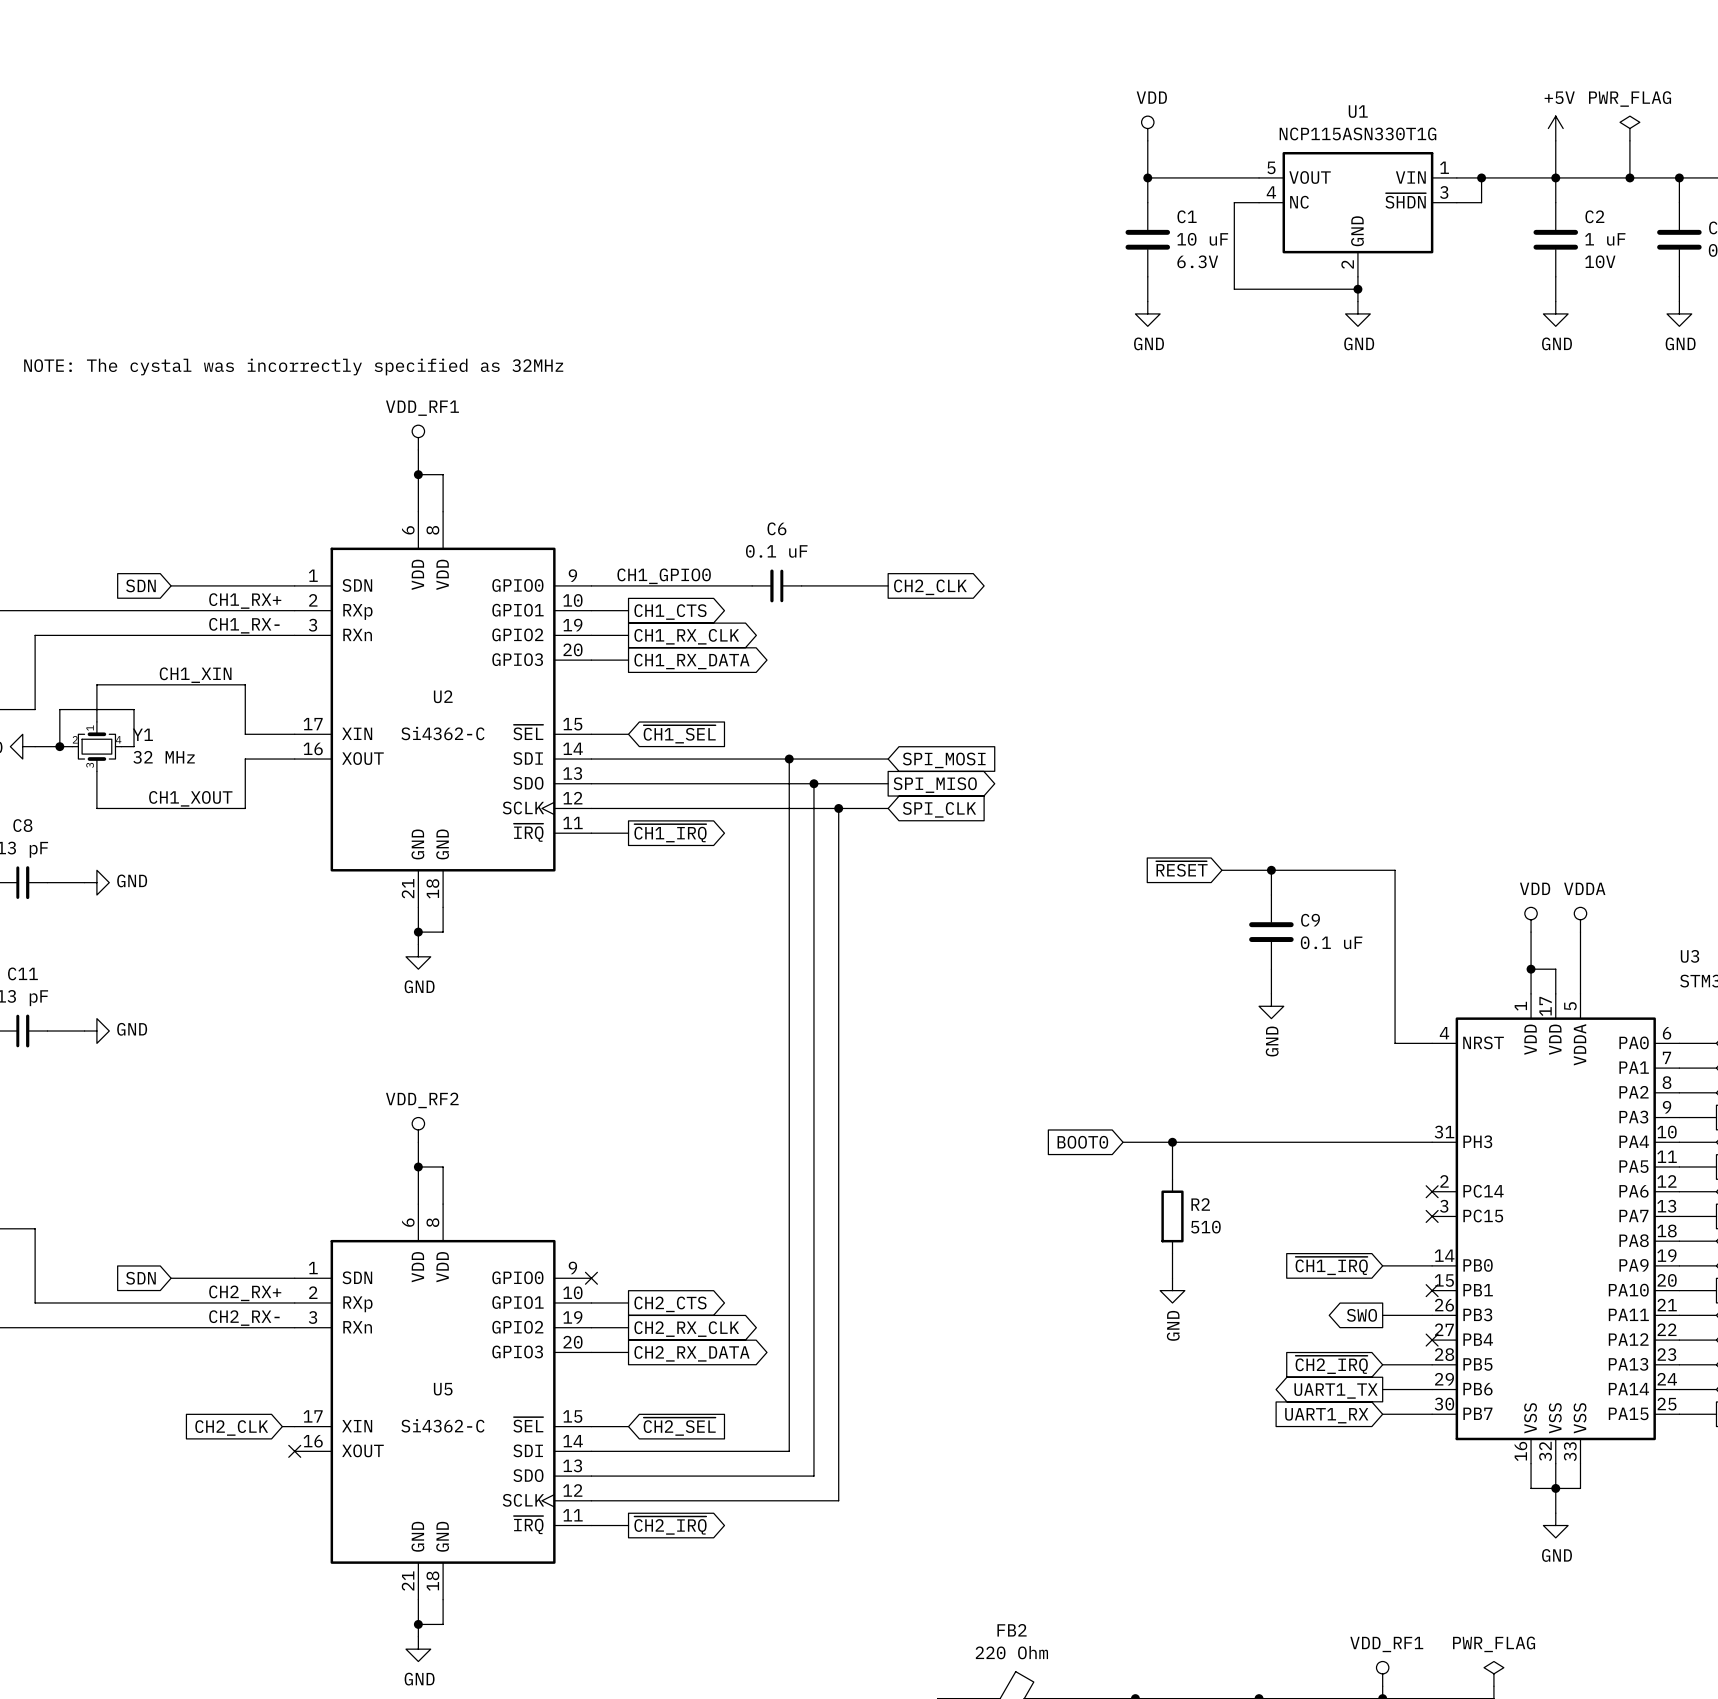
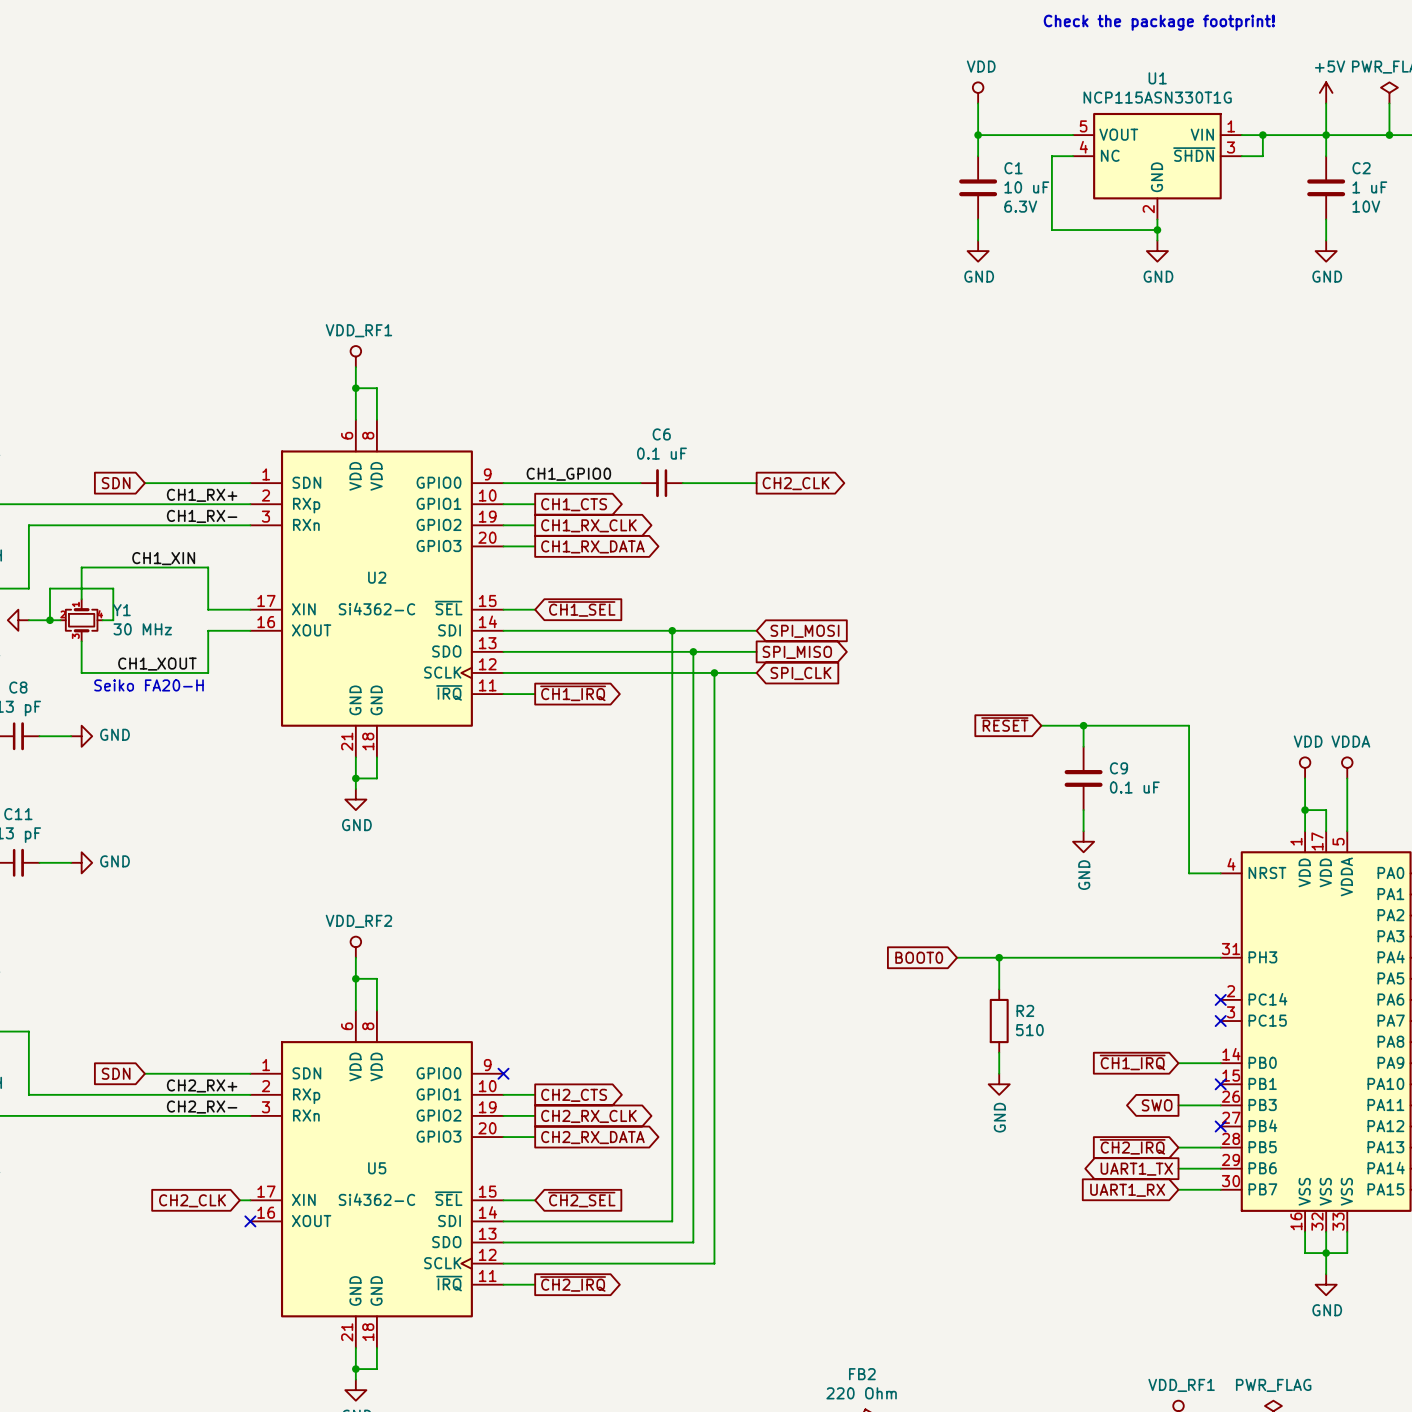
text: none -> Check the package footprint! (1159, 22)
text: NOTE: The cystal was incorrectly specified as 32MHz (293, 366) -> none
Y1 value: 32 MHz (164, 757) -> 30 MHz (142, 629)
text: none -> Seiko FA20-H (149, 685)

